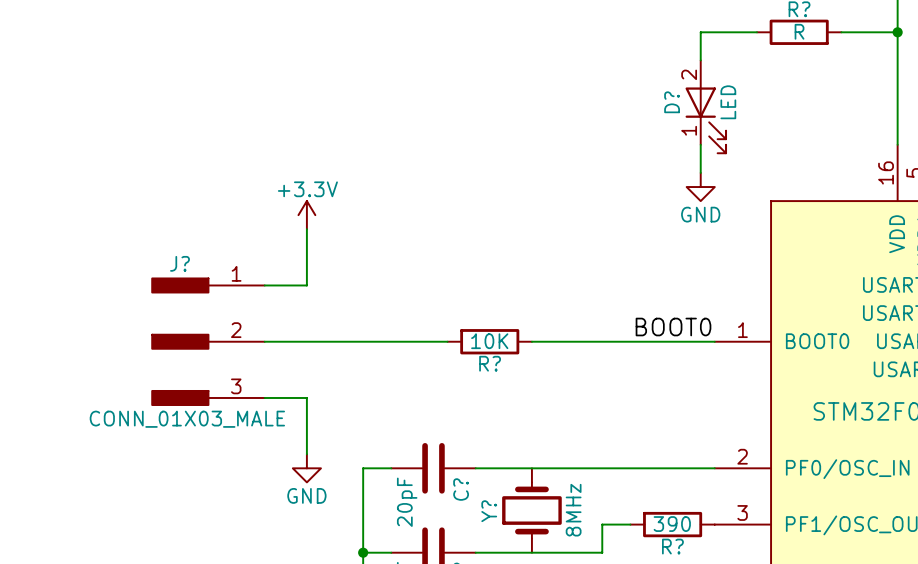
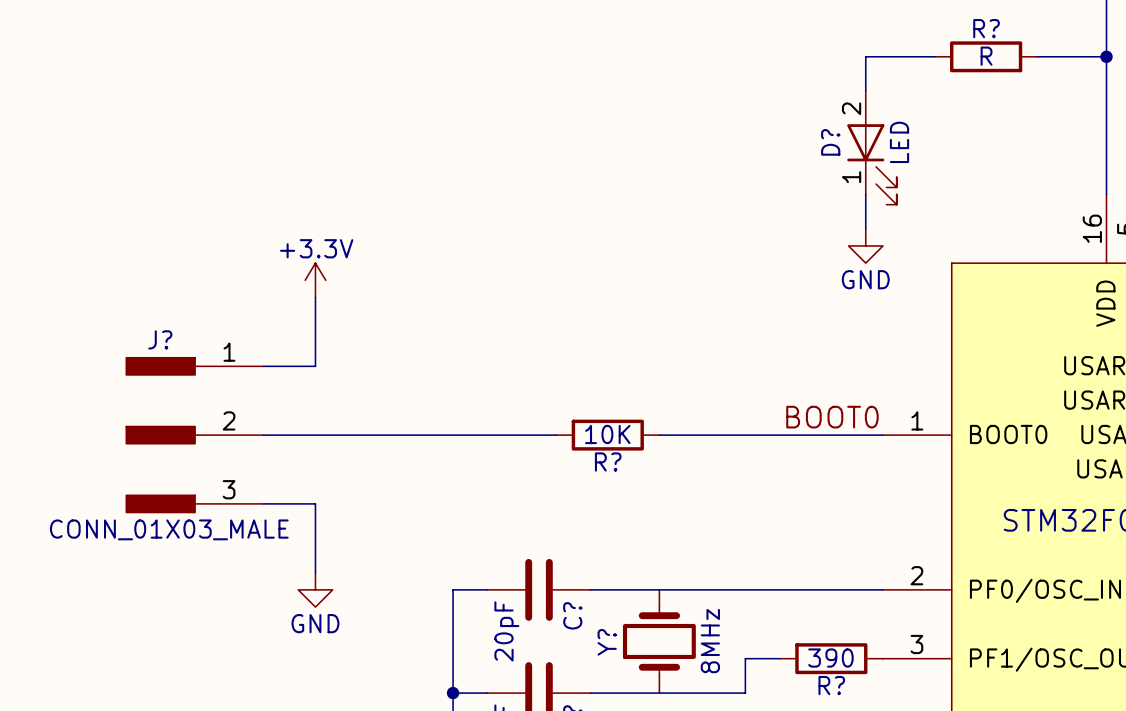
power symbol position: +3.3V (306, 215) -> +3.3V (315, 280)
wire: (306, 229) (306, 285) (264, 285) -> (315, 297) (315, 366) (263, 366)
J? position: (208, 341) -> (195, 435)
wire: (264, 397) (306, 397) (306, 454) -> (263, 503) (315, 503) (315, 572)
power symbol position: GND (306, 468) -> GND (315, 589)

